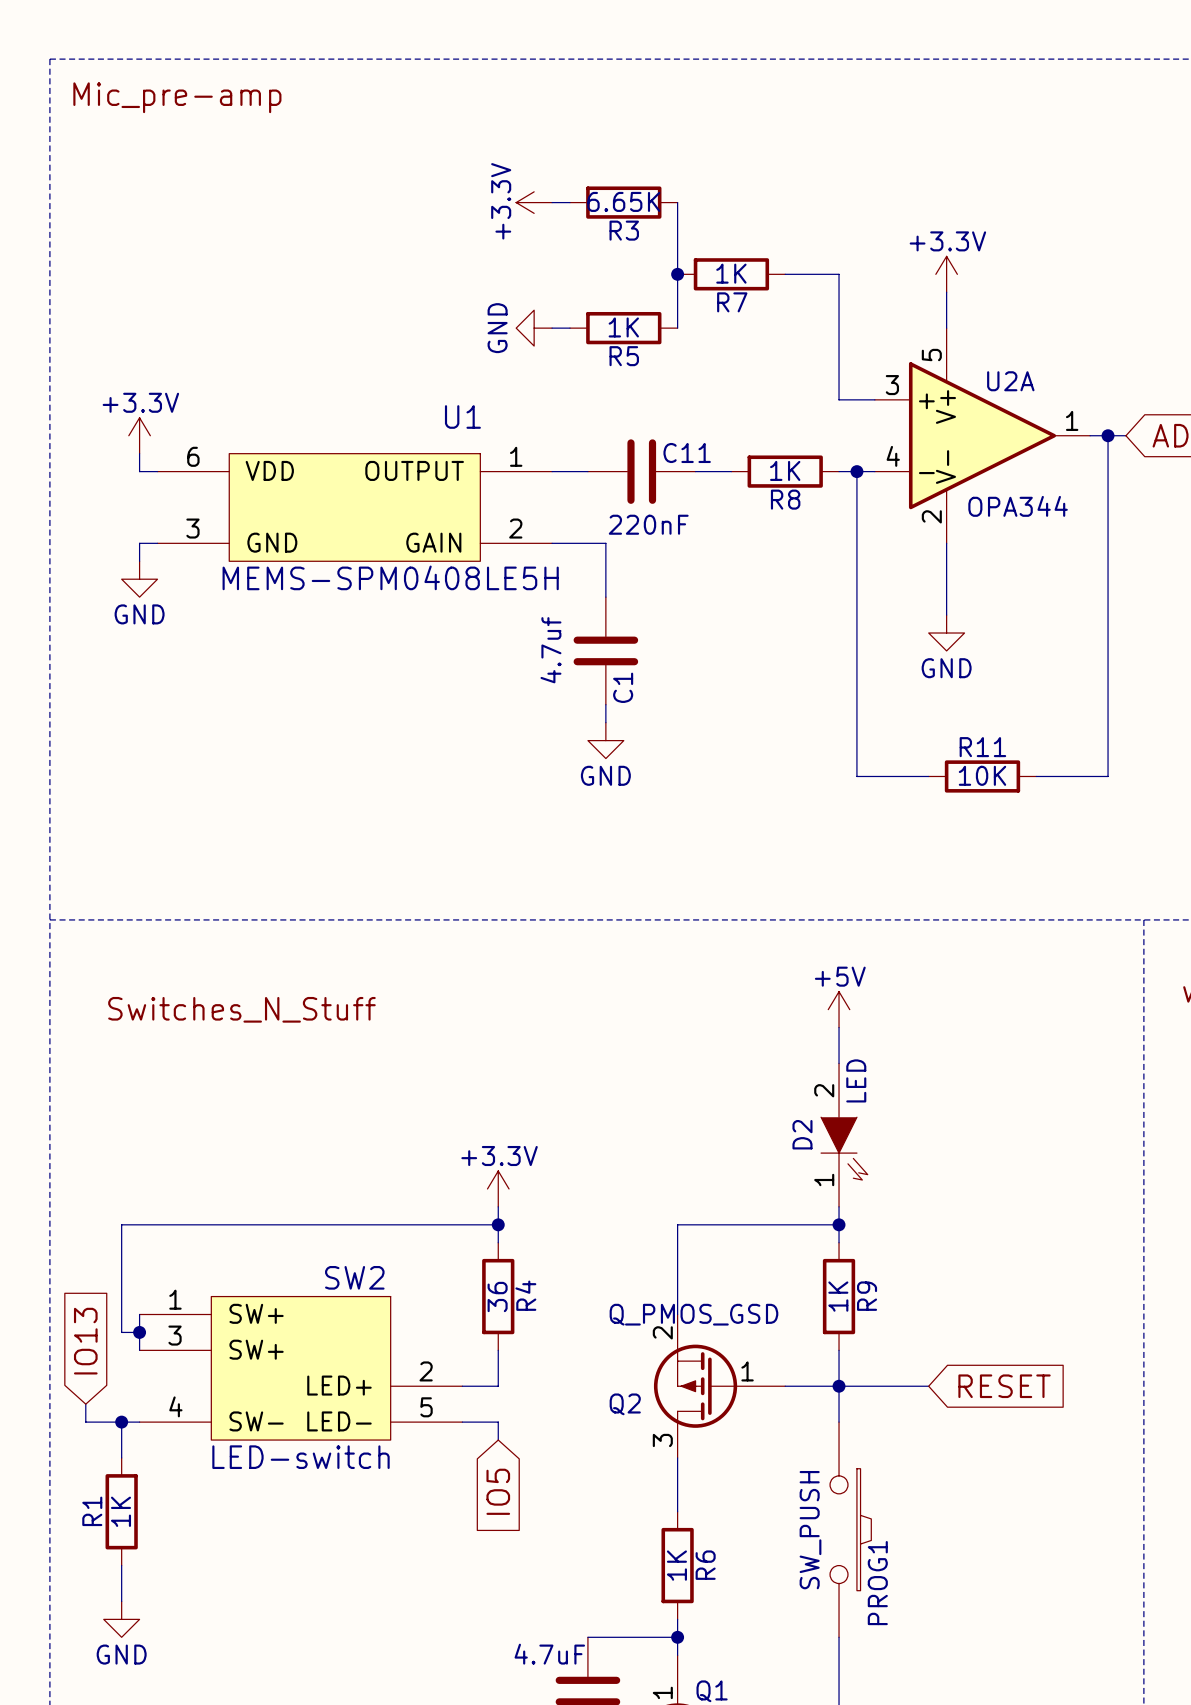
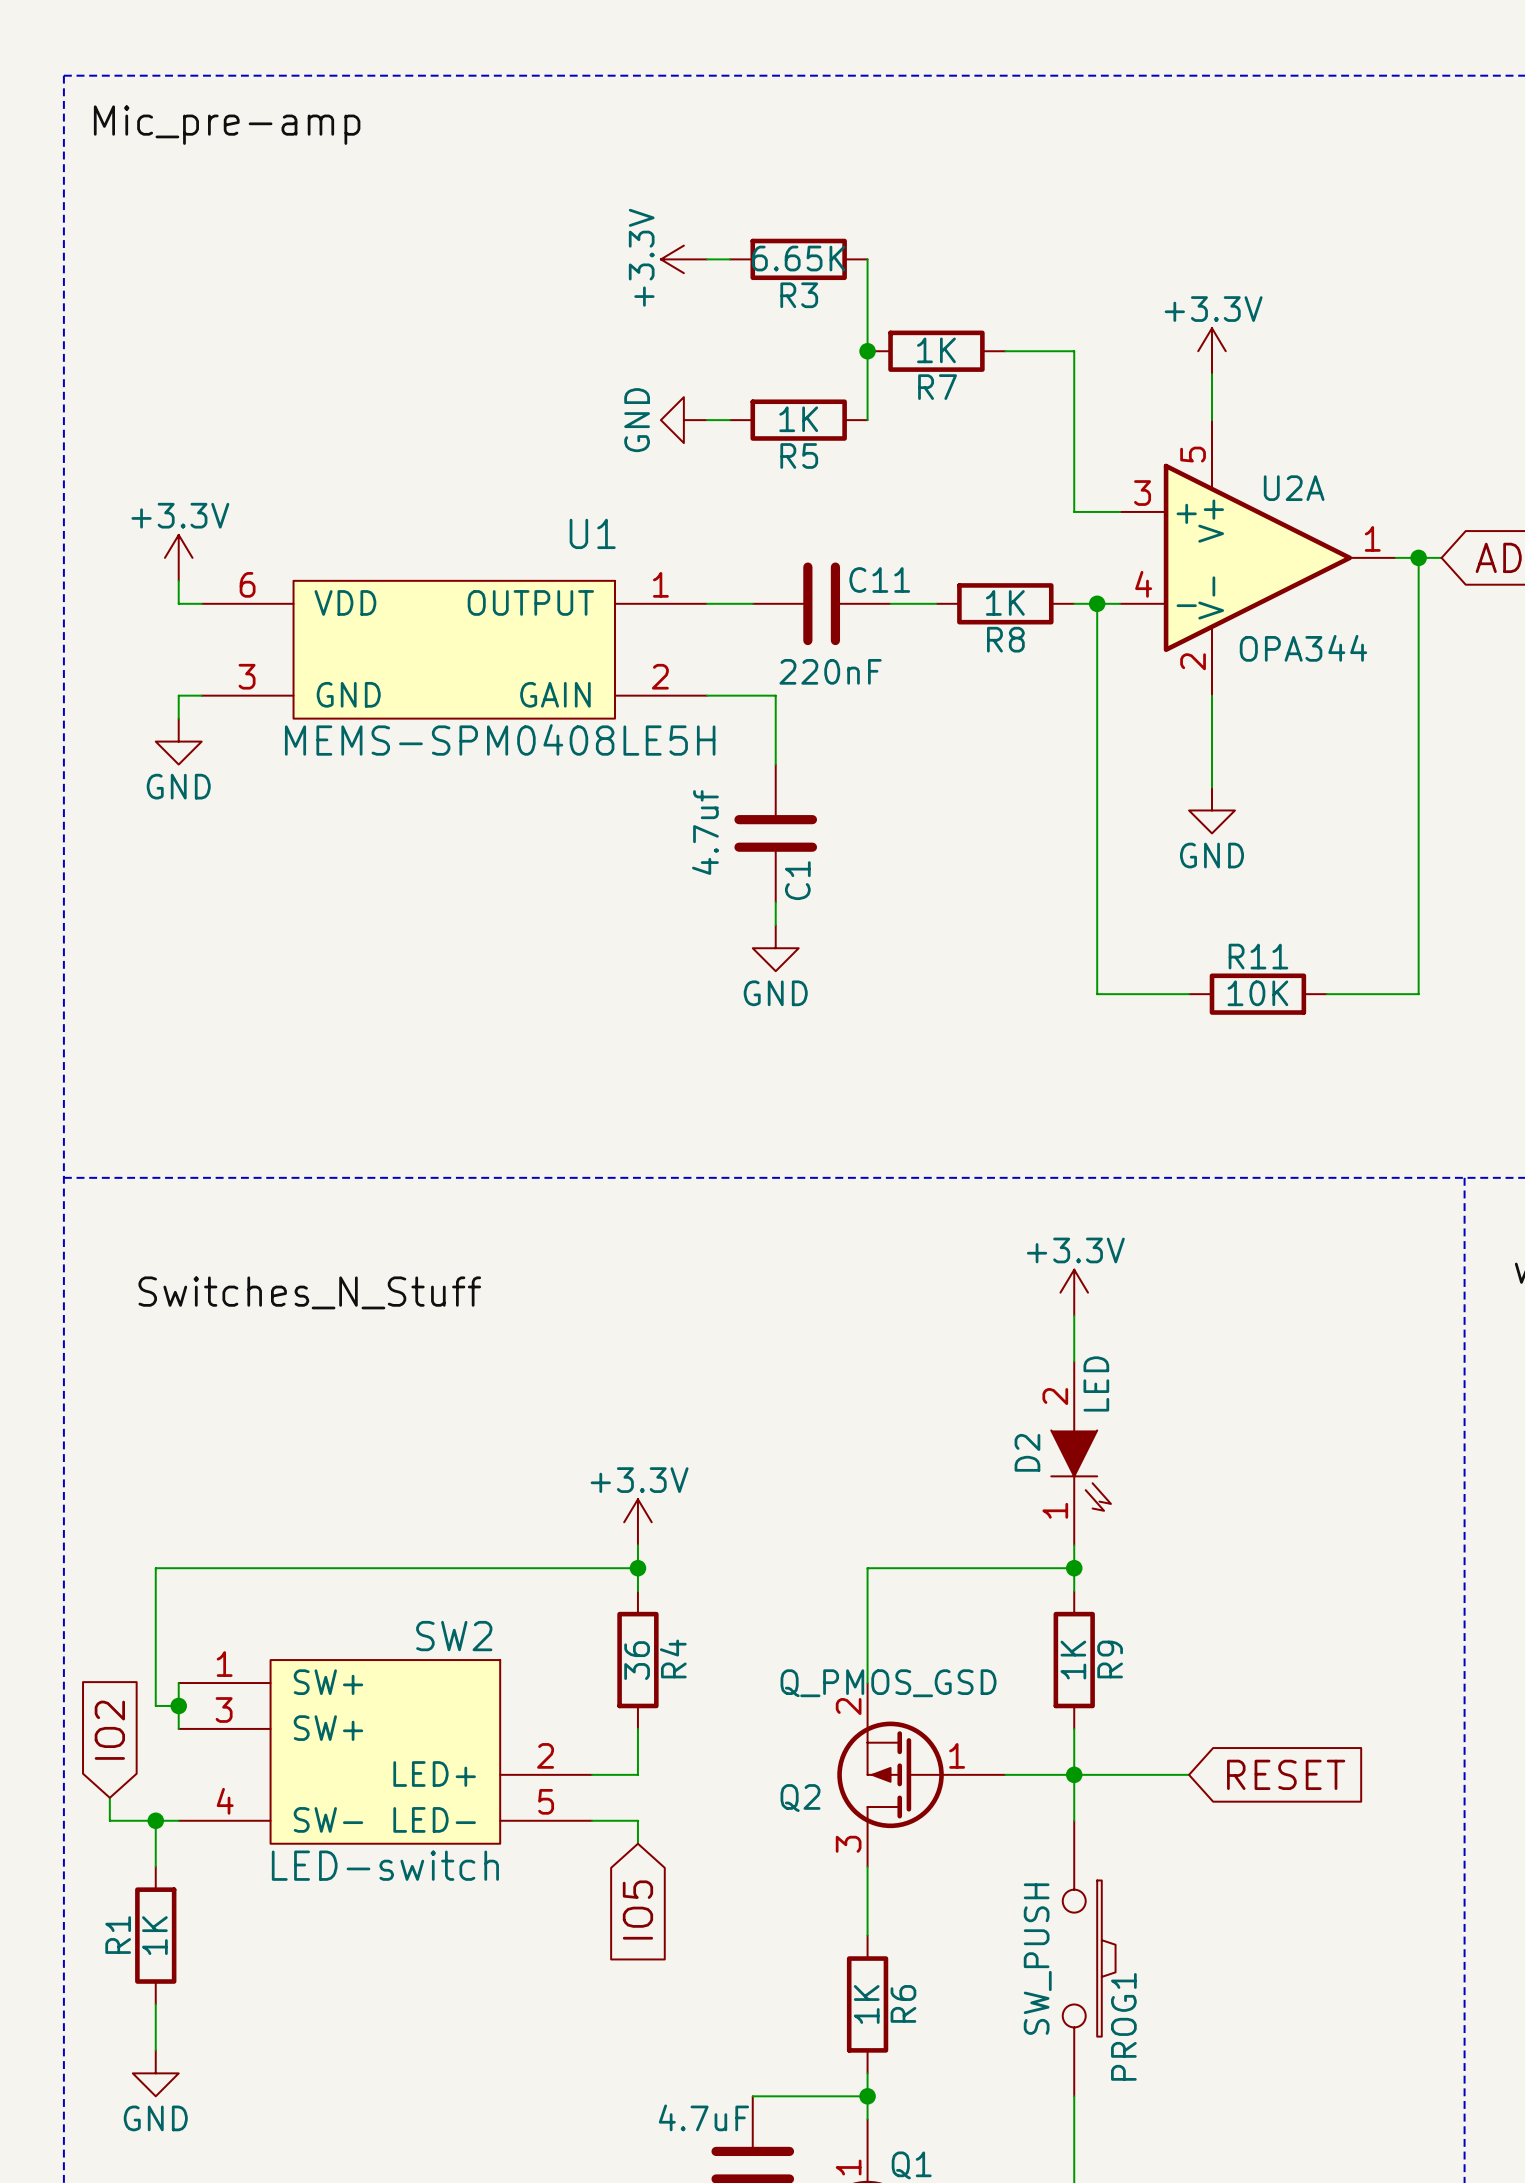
power symbol: +5V (839, 1009) -> +3.3V (1074, 1292)
global label: IO13 (85, 1341) -> IO2 (109, 1730)

